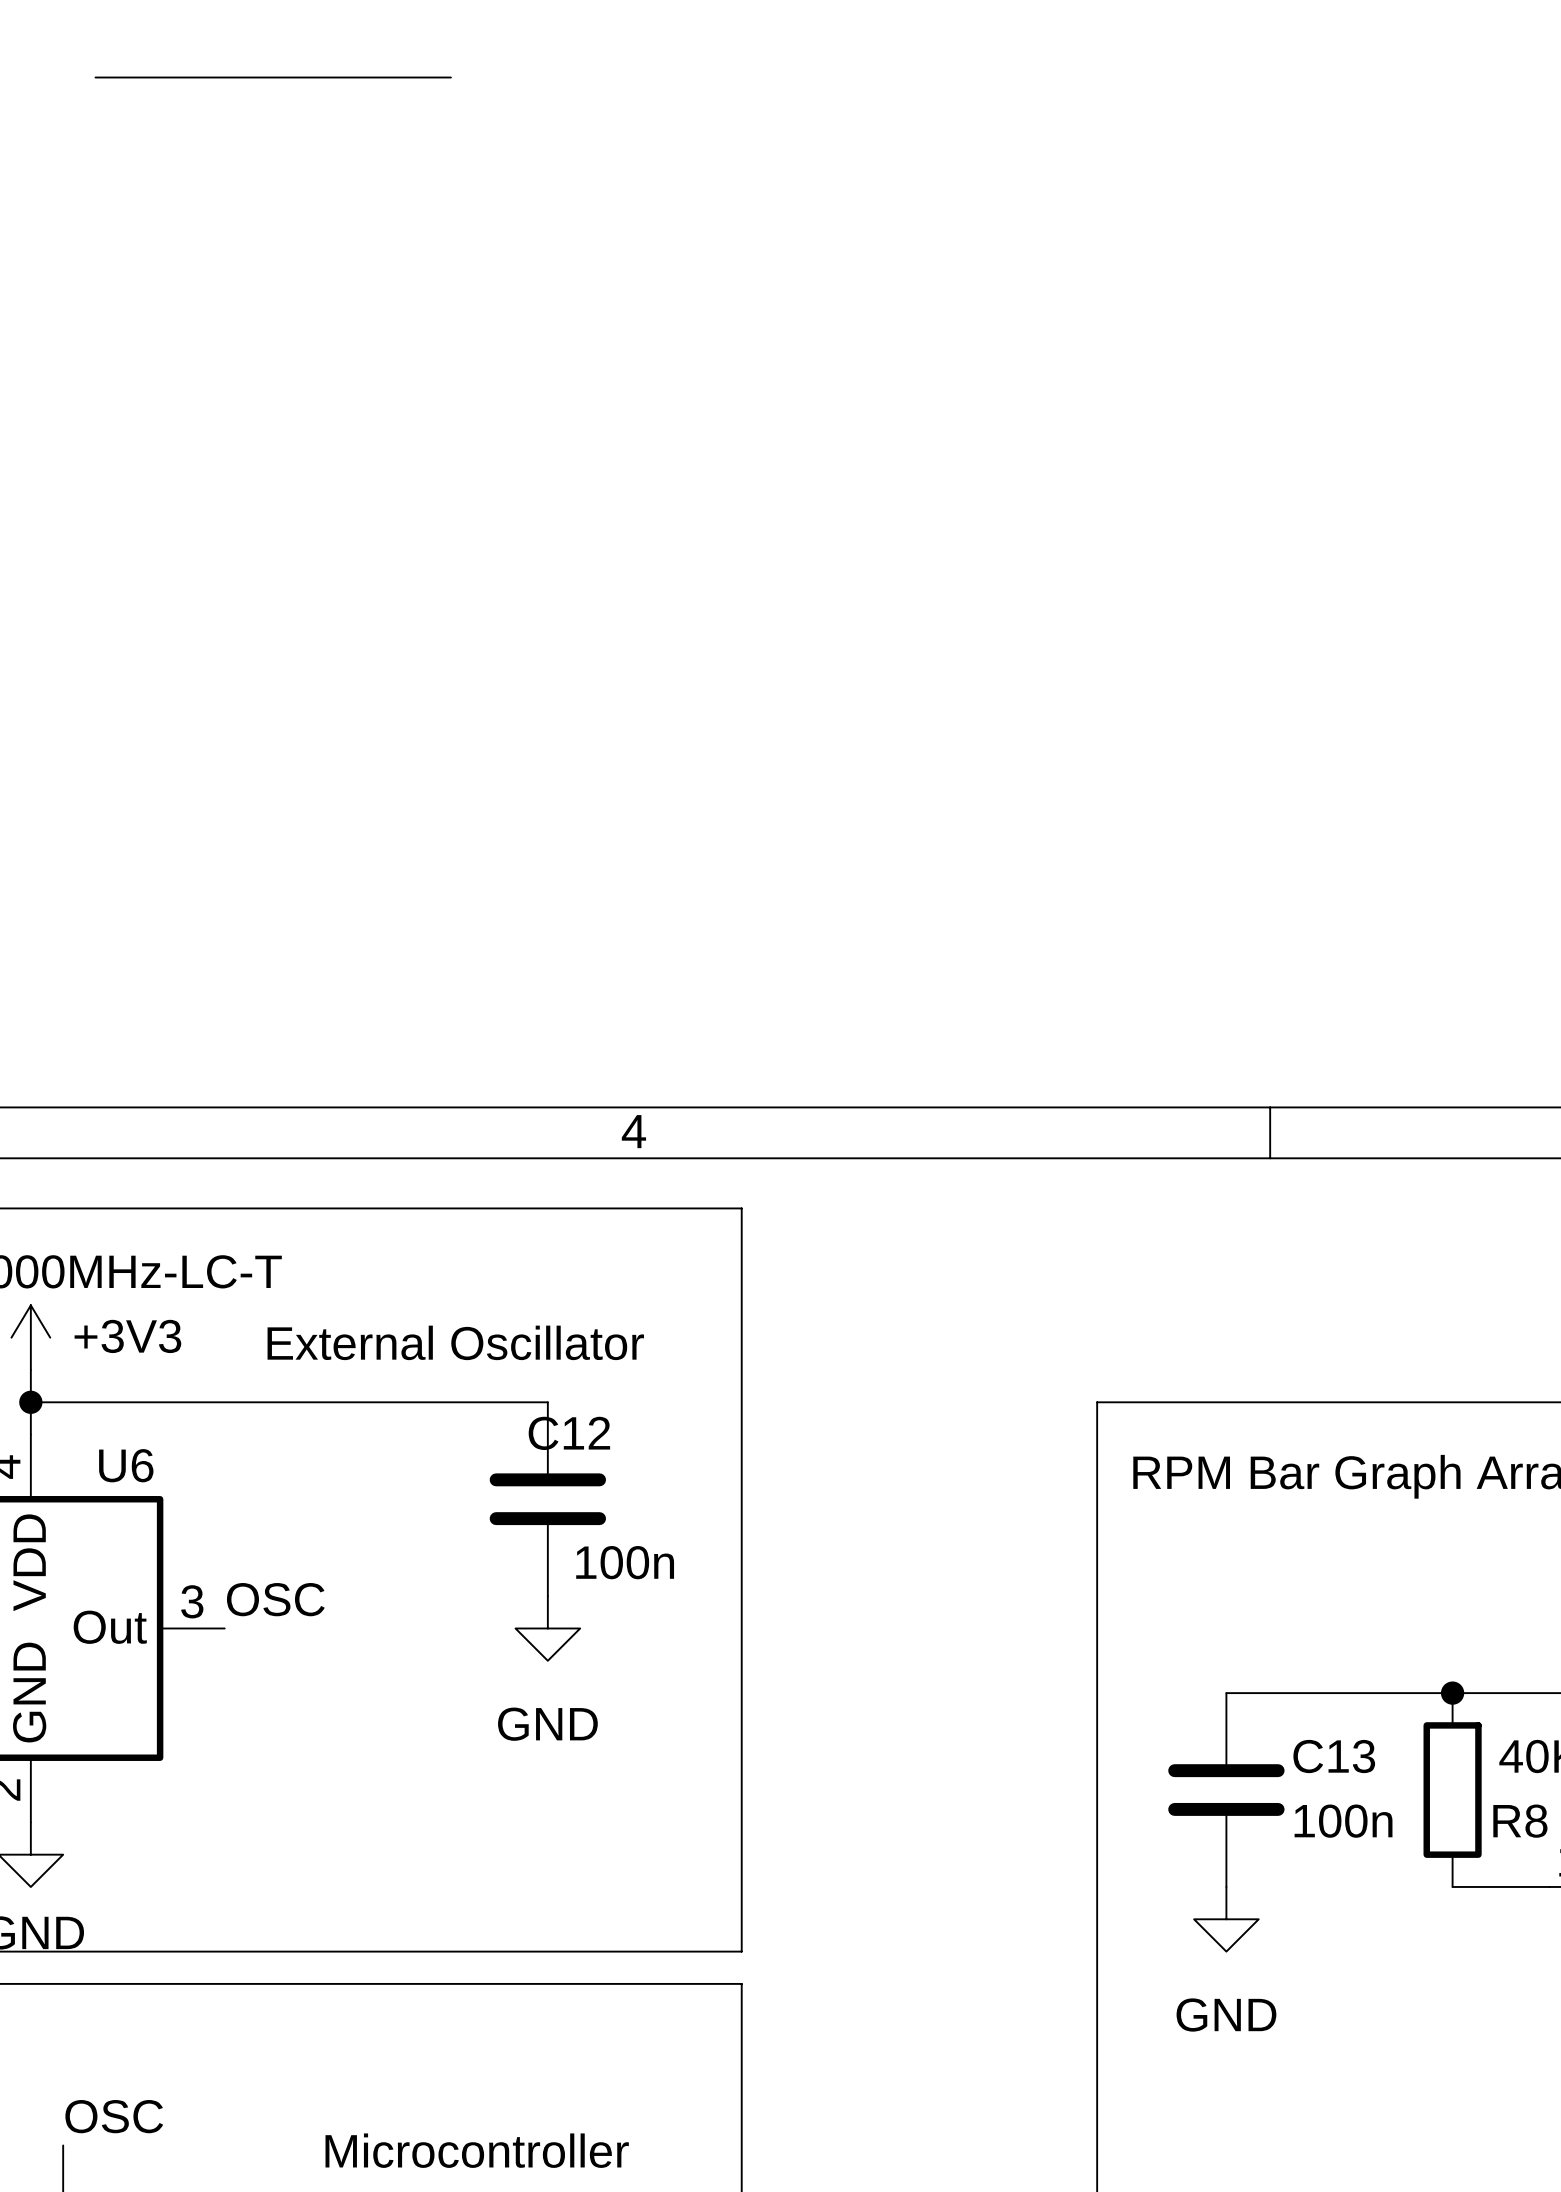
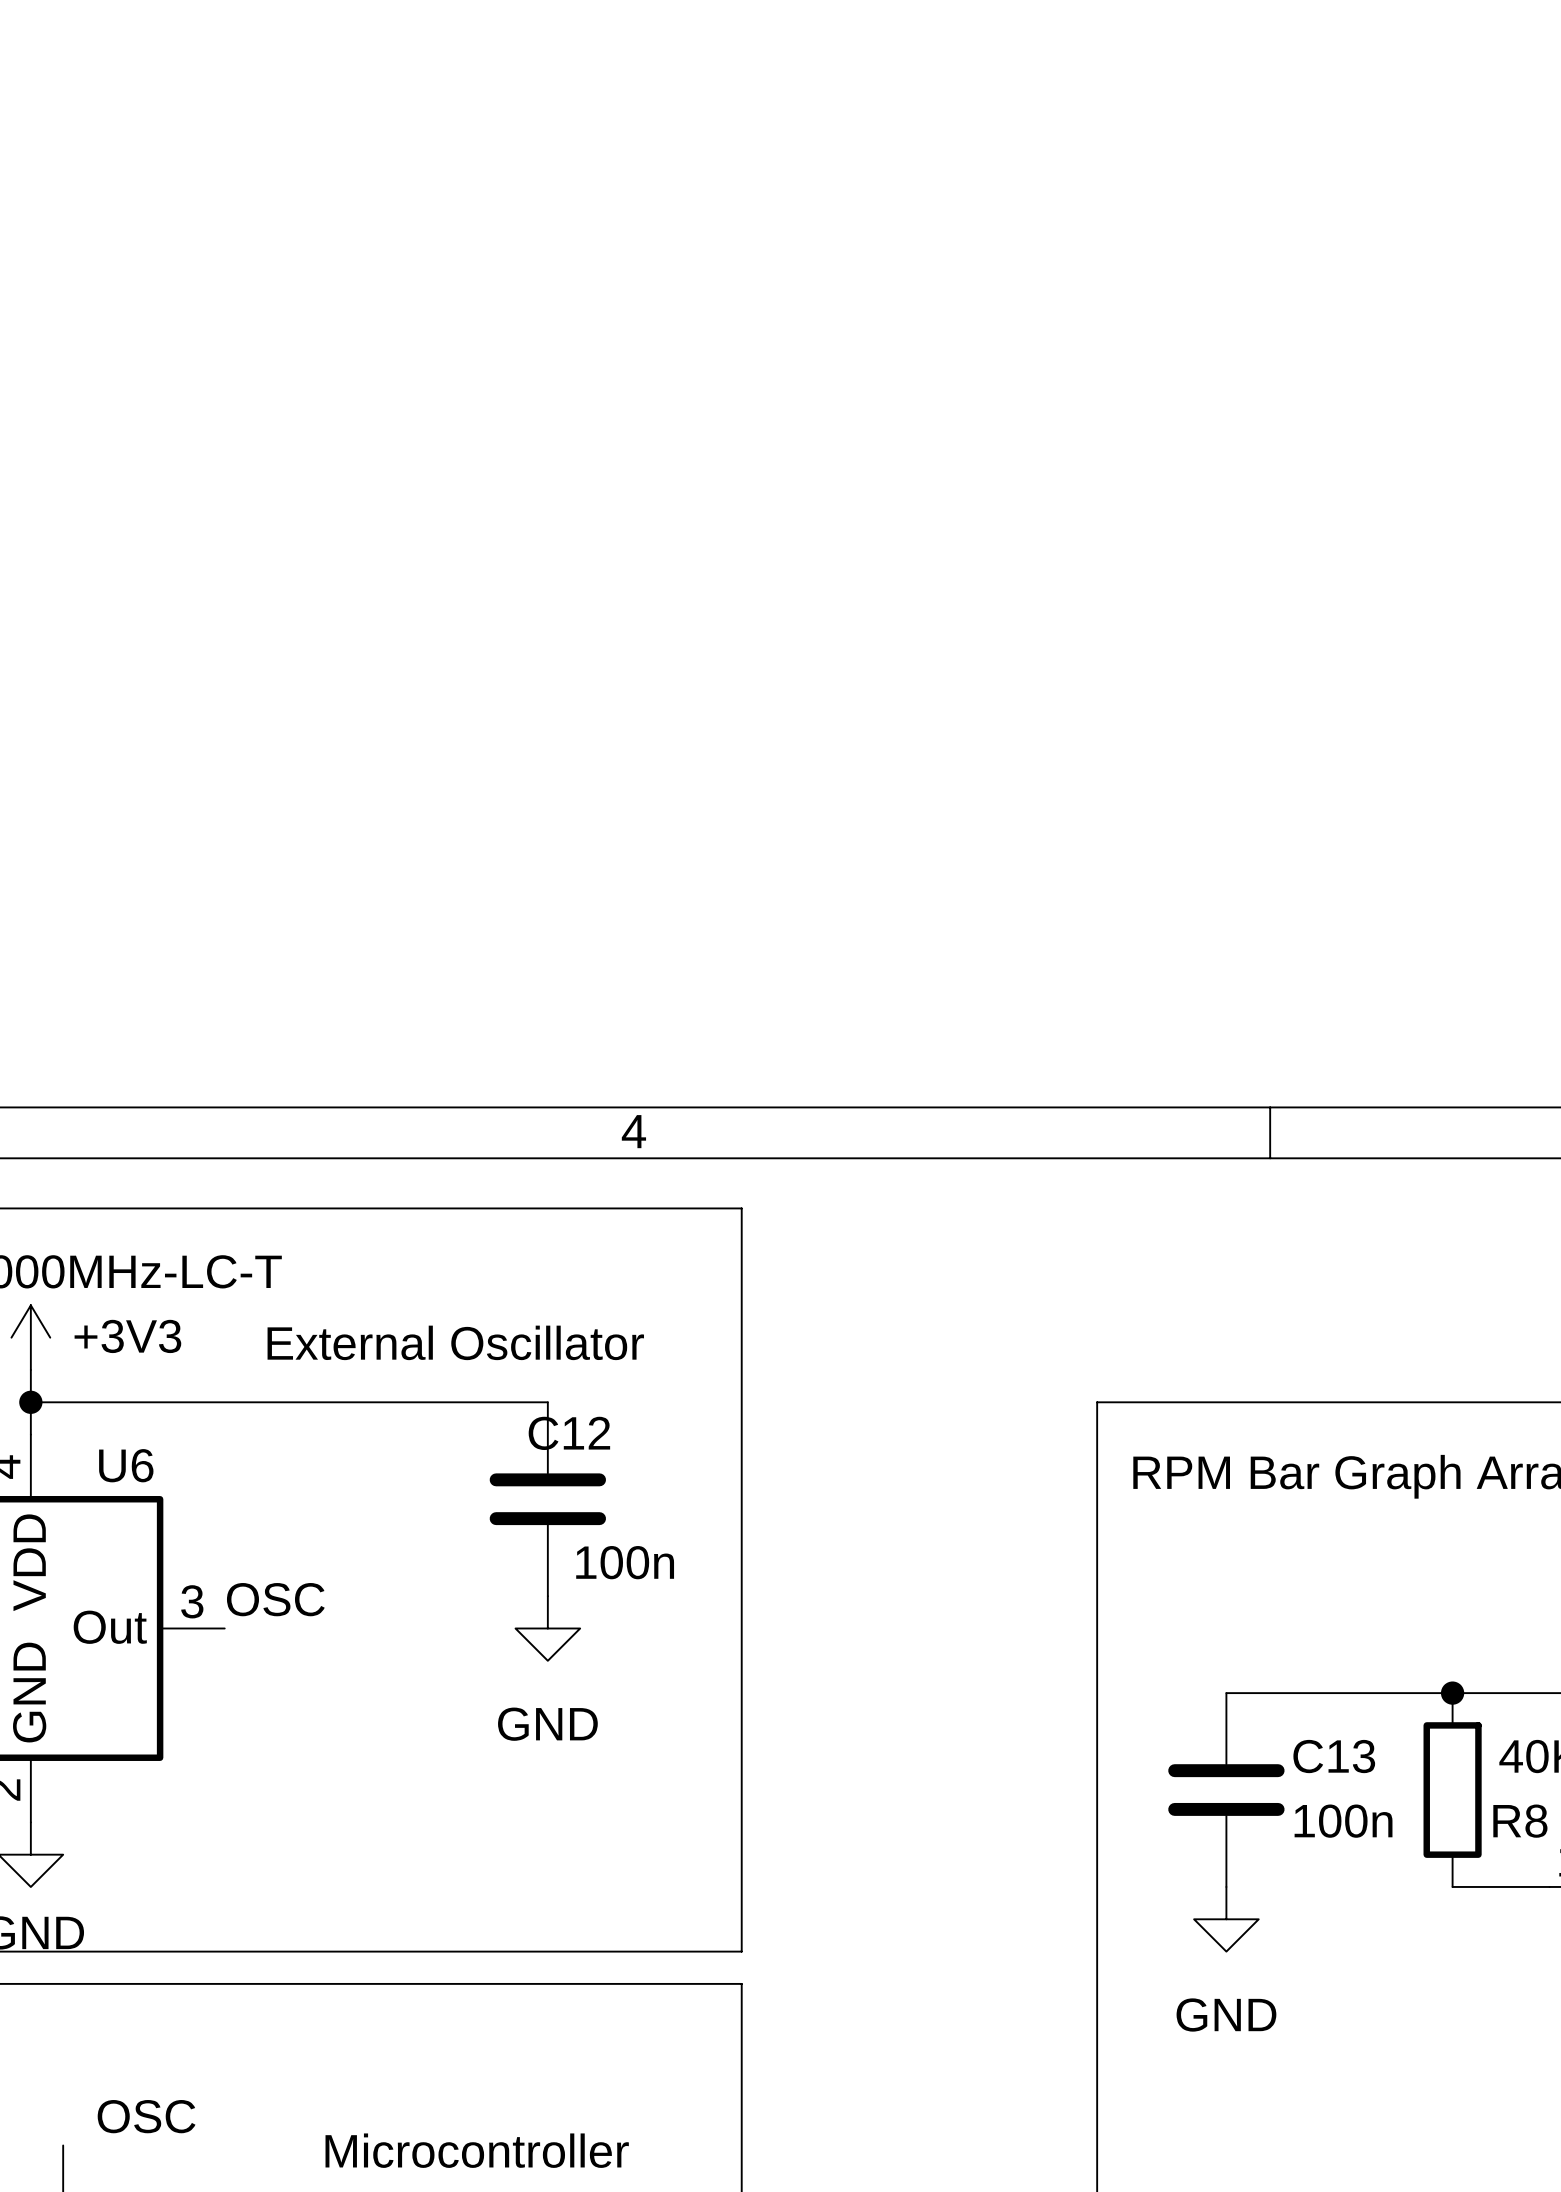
wire: (95, 77) (450, 77) -> none
label position: OSC (114, 2116) -> OSC (146, 2116)

